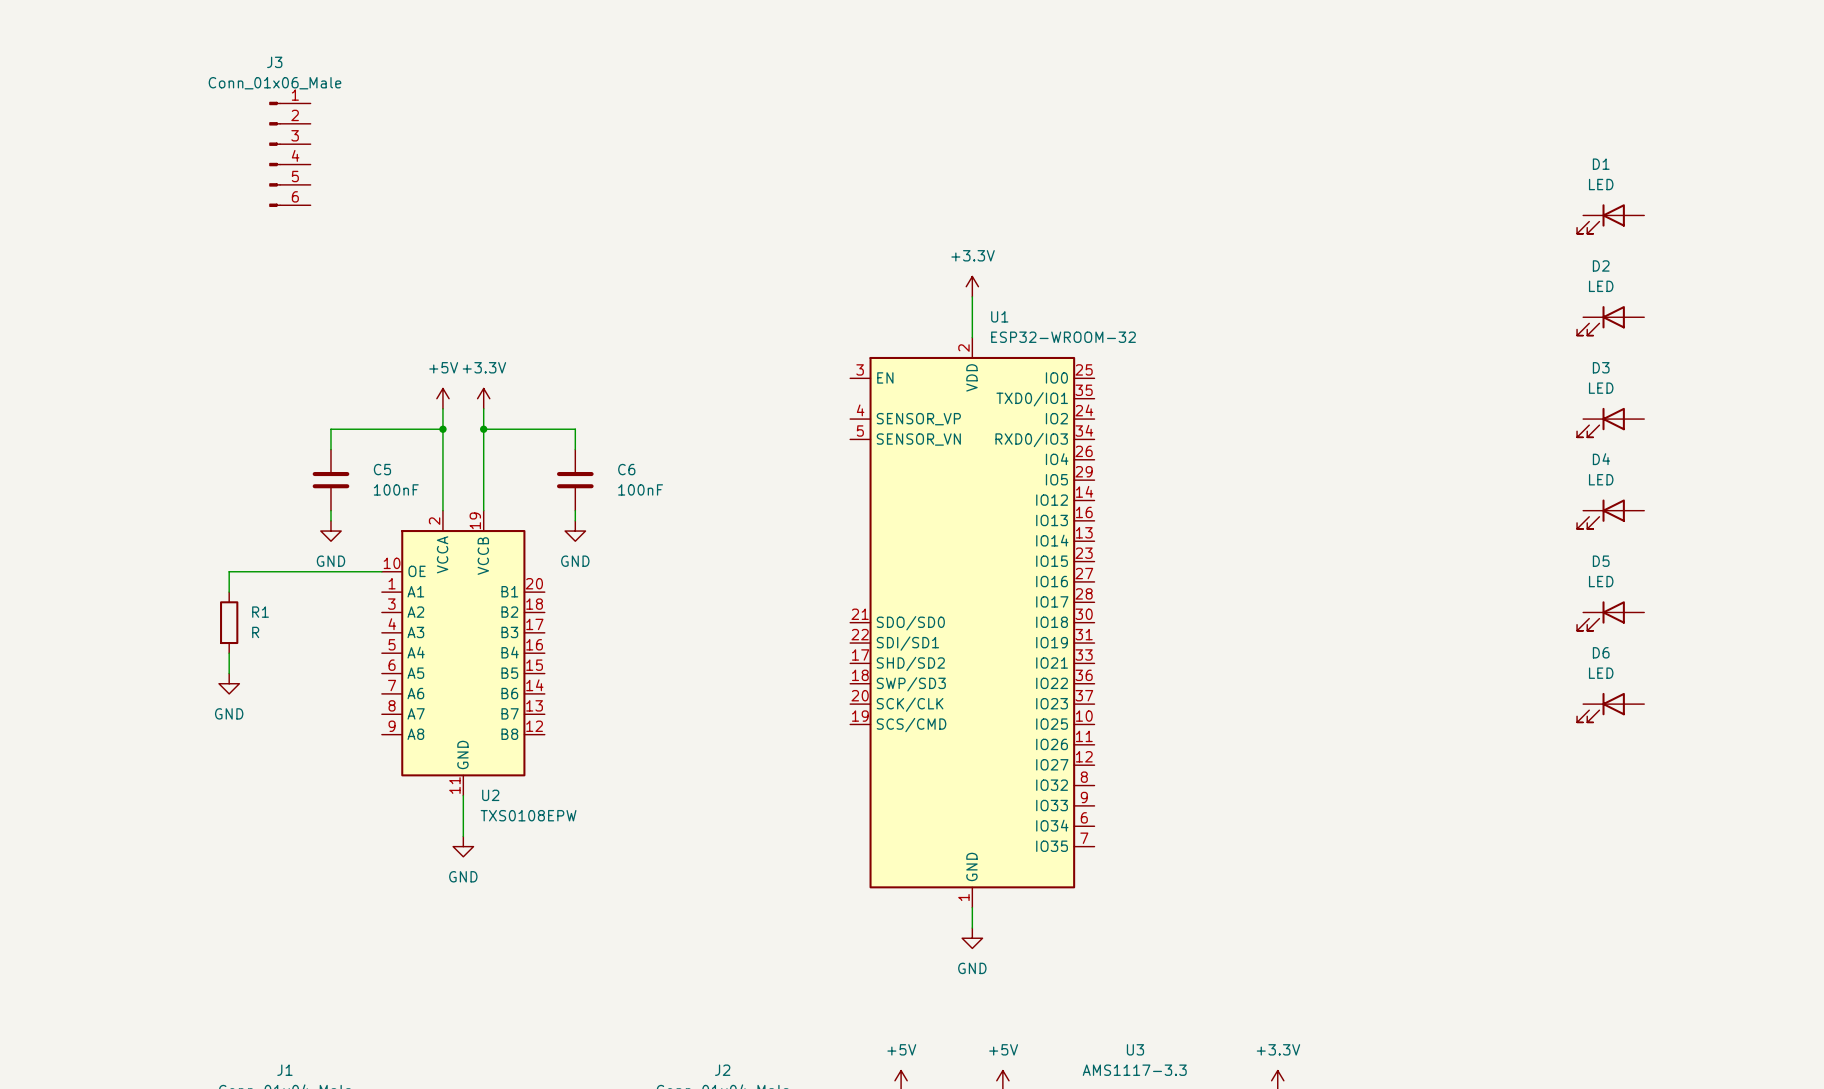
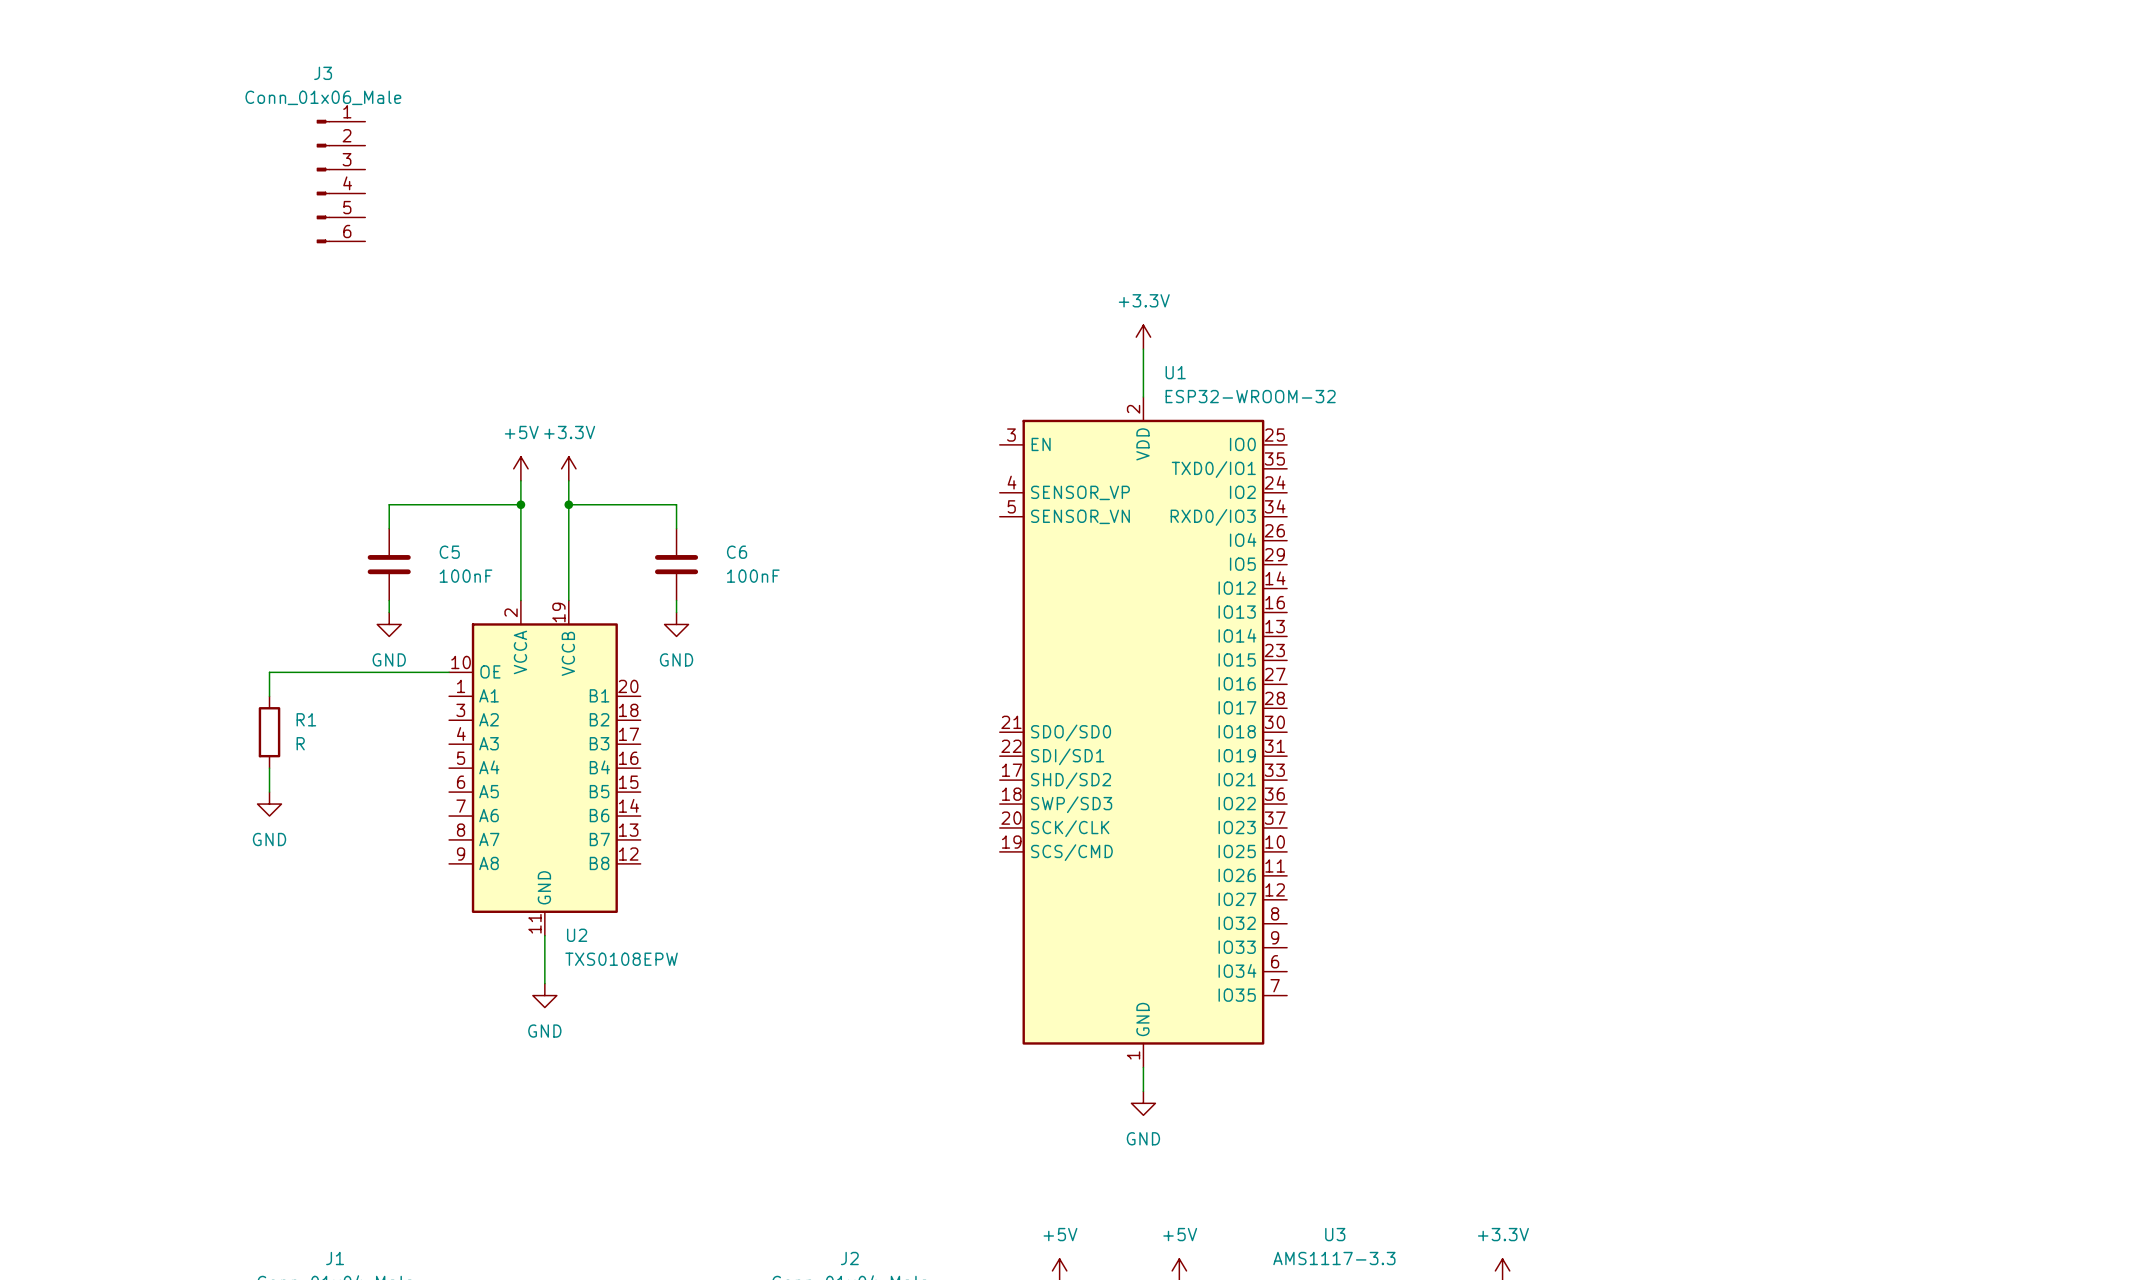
D1: LED (1610, 219) -> none
D2: LED (1610, 320) -> none
D3: LED (1610, 422) -> none
D4: LED (1610, 514) -> none
D5: LED (1610, 616) -> none
D6: LED (1610, 707) -> none

